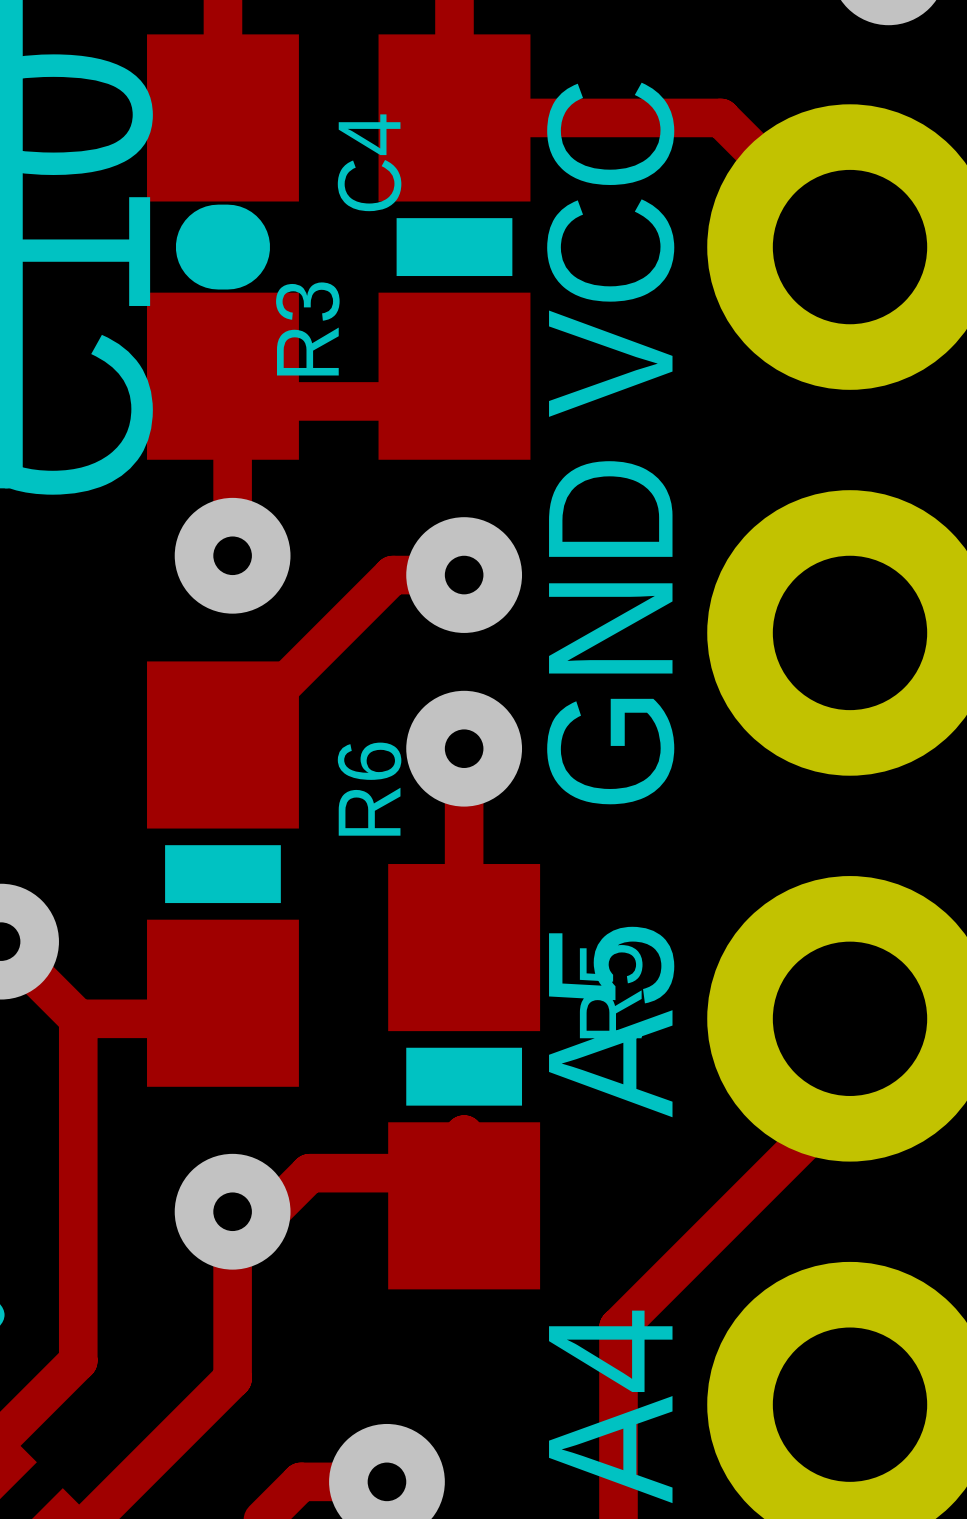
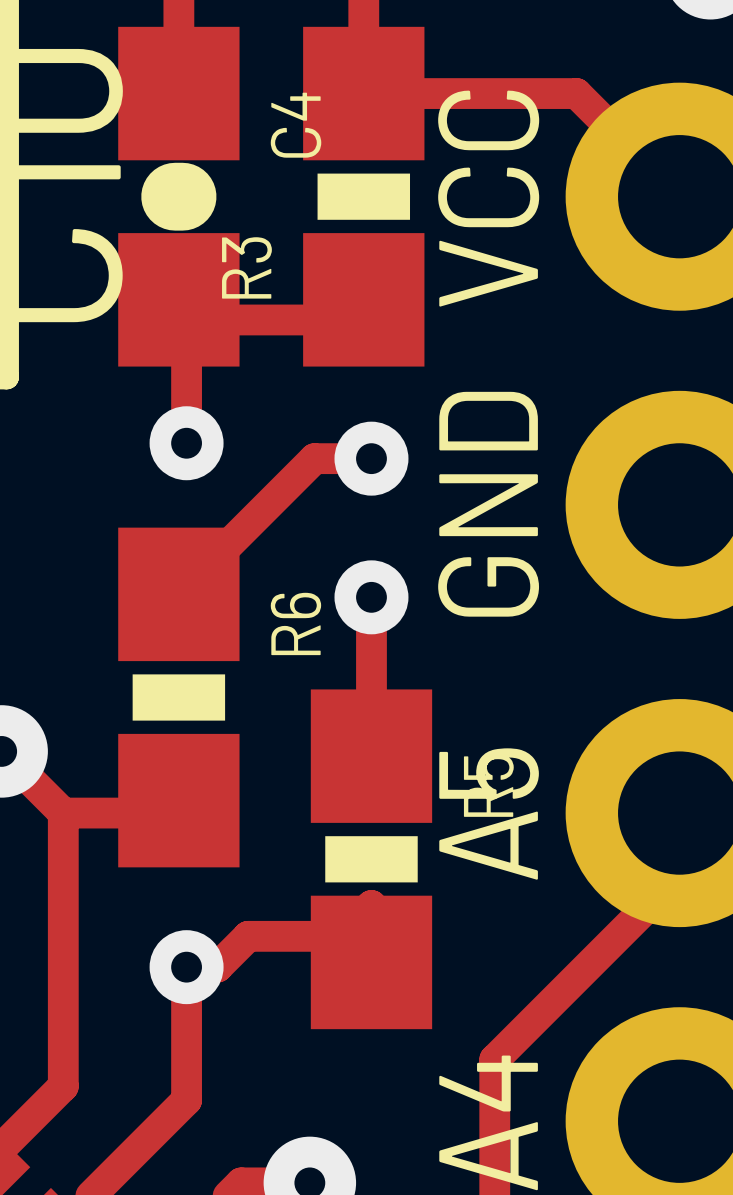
via size: [174, 497, 291, 614] -> [149, 406, 224, 481]
via size: [406, 517, 523, 633] -> [334, 421, 409, 496]
via size: [406, 690, 523, 807] -> [334, 560, 409, 635]
via size: [174, 1153, 291, 1270] -> [149, 930, 224, 1005]

